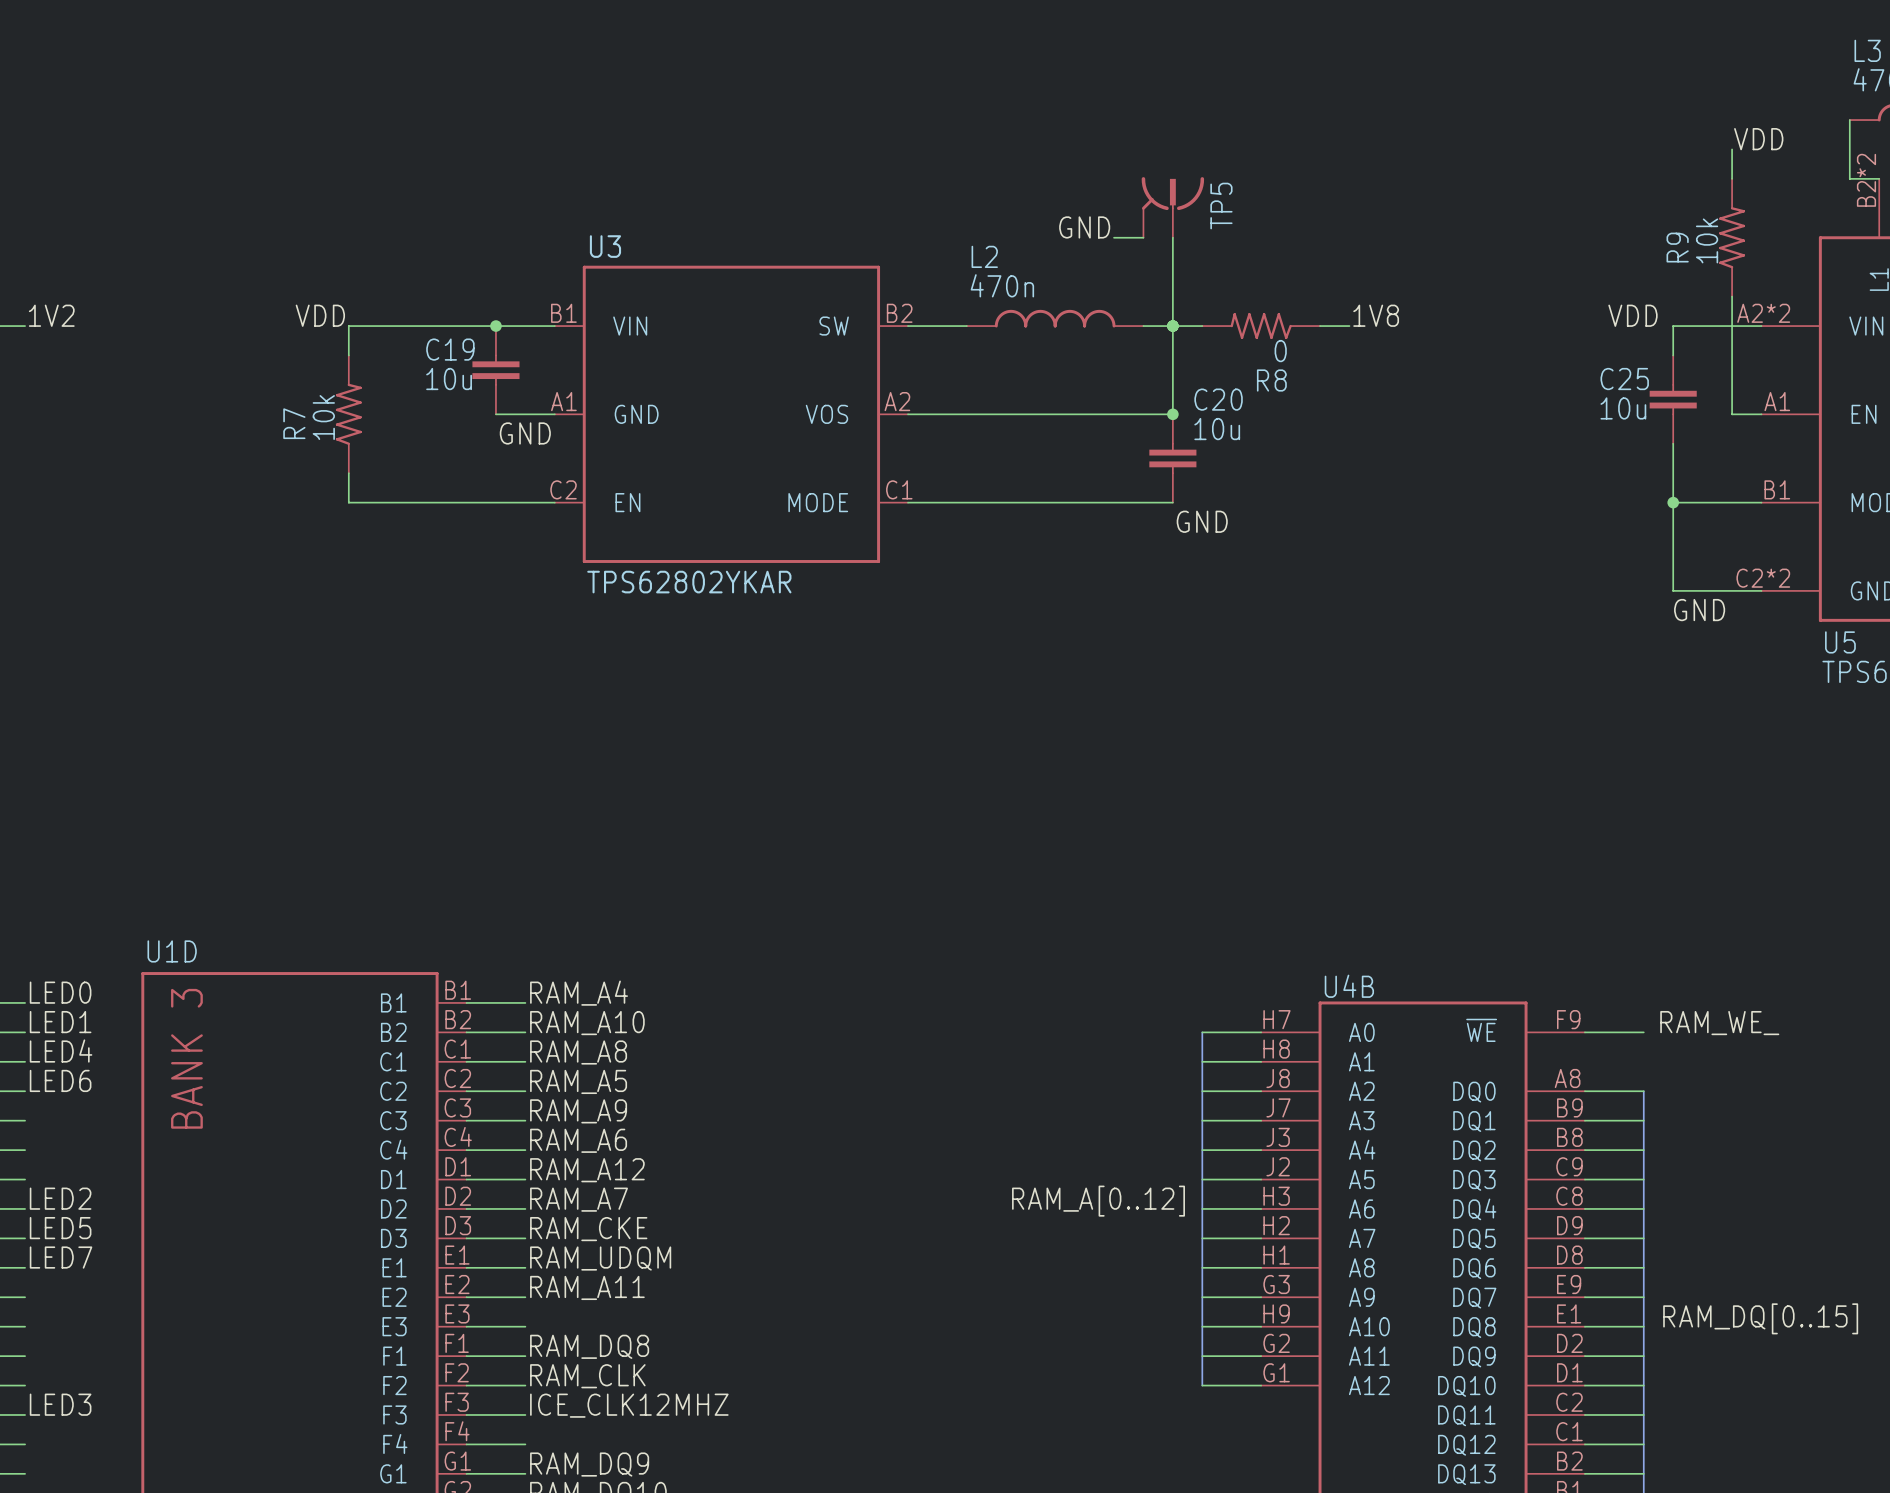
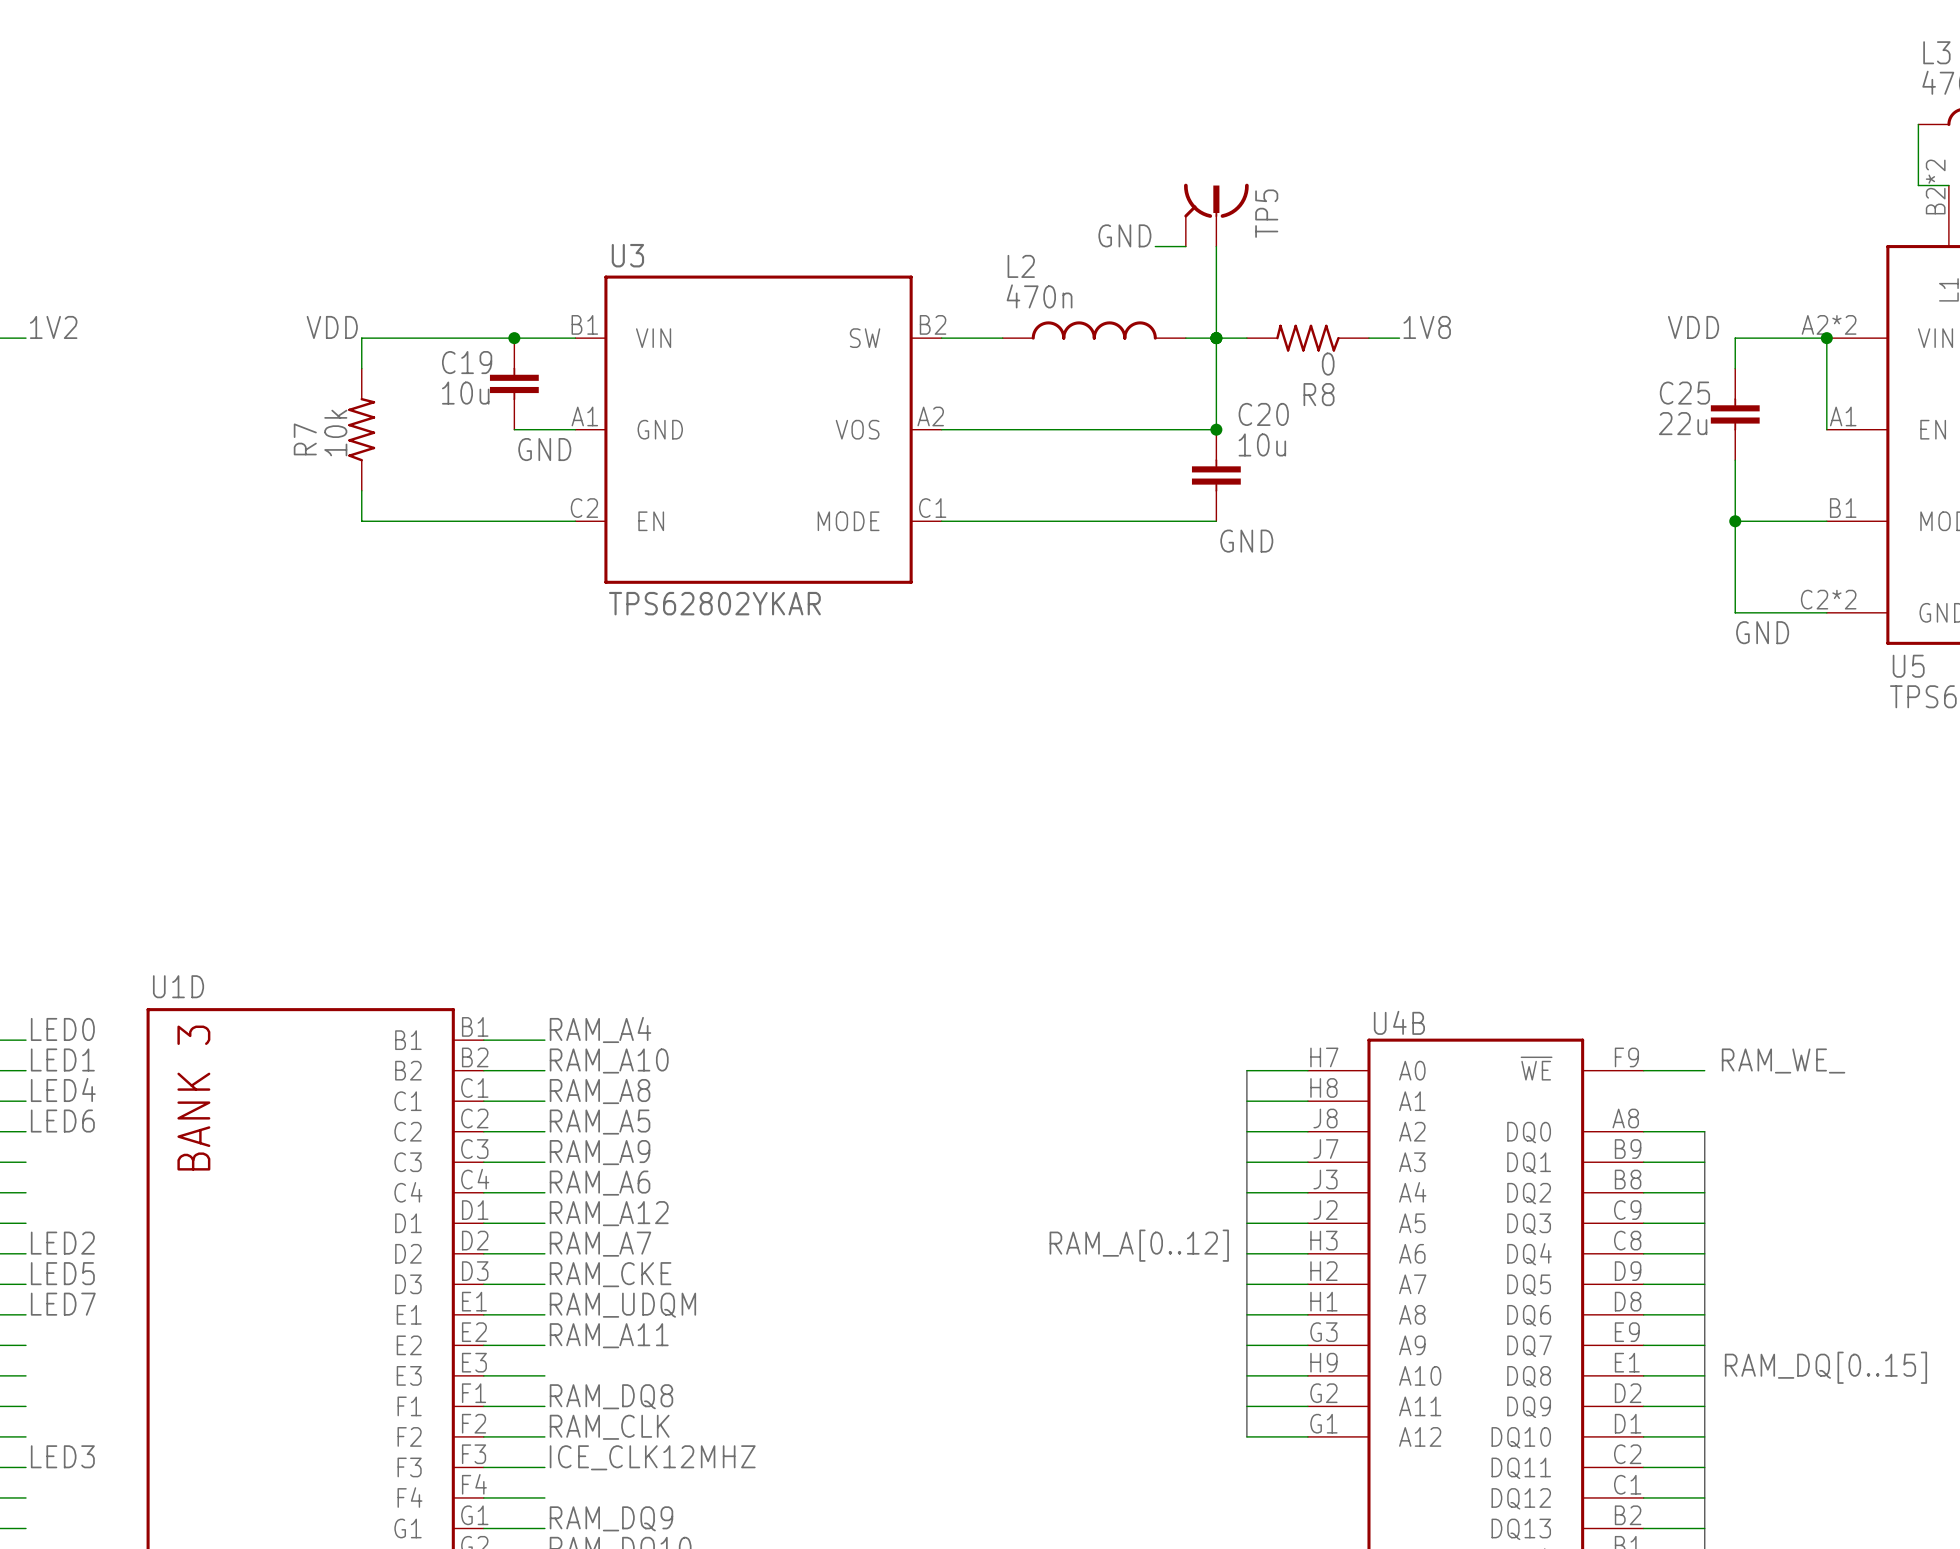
label: VDD (1758, 139) -> none
wire: (1732, 149) (1732, 178) -> none
R9: 10k (1732, 237) -> none
wire: (1732, 296) (1732, 414) (1761, 414) -> (1826, 338) (1826, 429)
junction: none -> (1826, 338)
C25 value: 10u (1623, 408) -> 22u (1683, 423)

